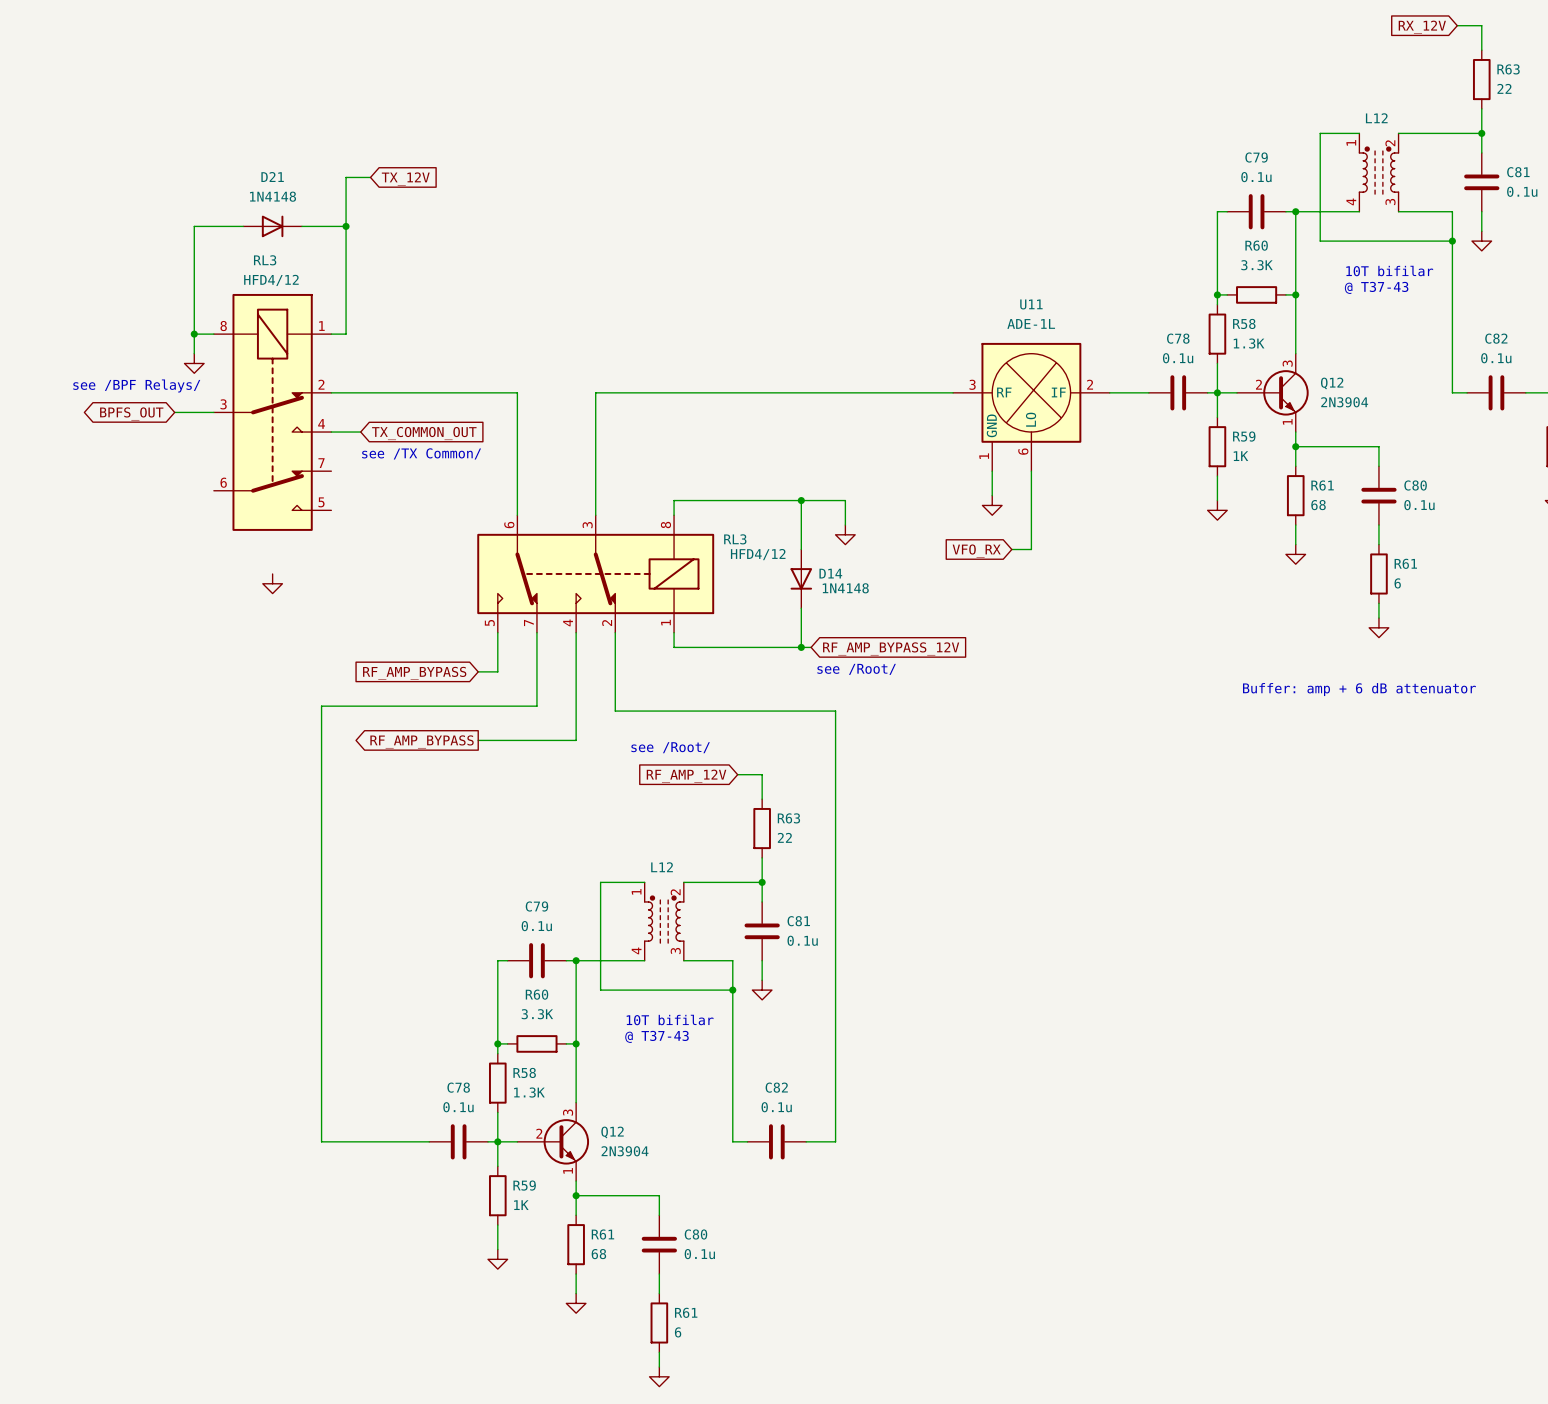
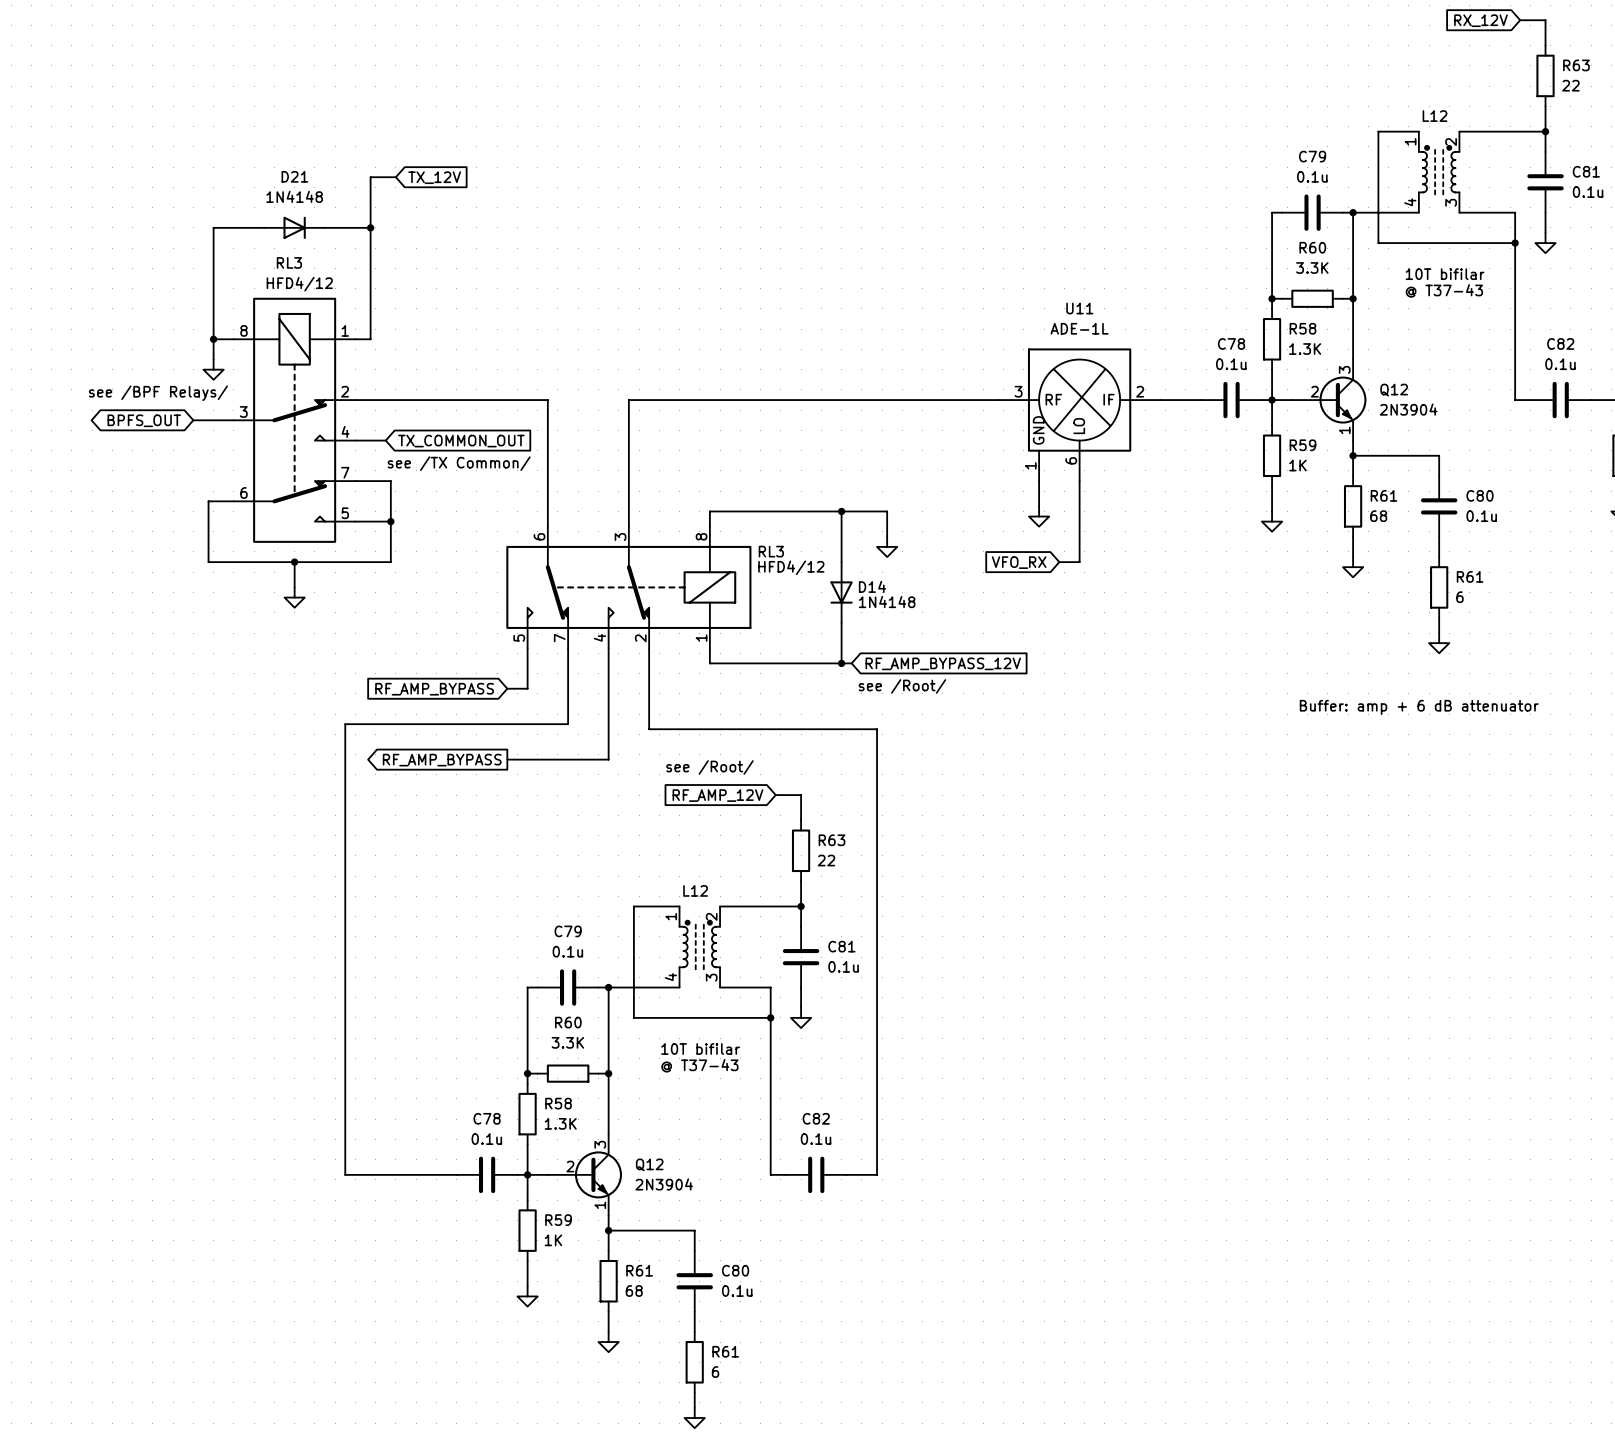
wire: none -> (355, 481) (390, 481) (390, 562) (208, 562) (208, 501) (233, 501)
wire: none -> (355, 521) (390, 521)
junction: none -> (390, 521)
wire: none -> (294, 562) (294, 587)
junction: none -> (294, 562)

